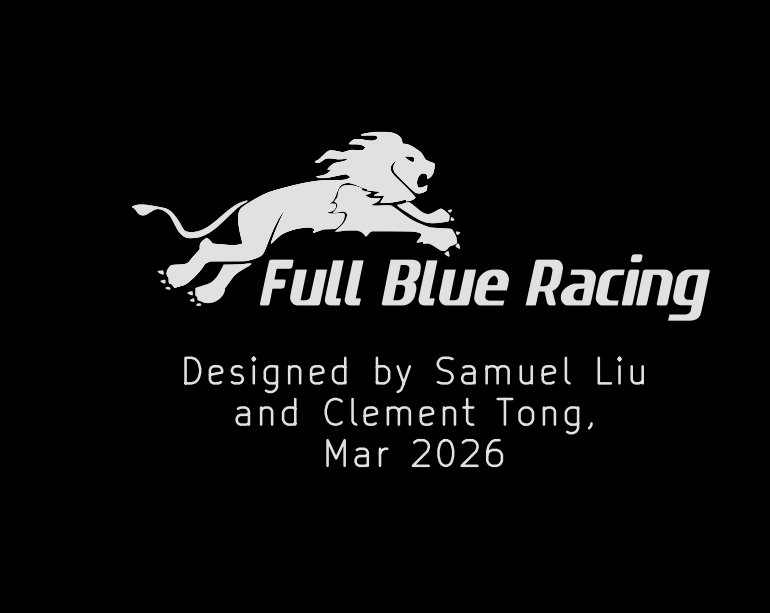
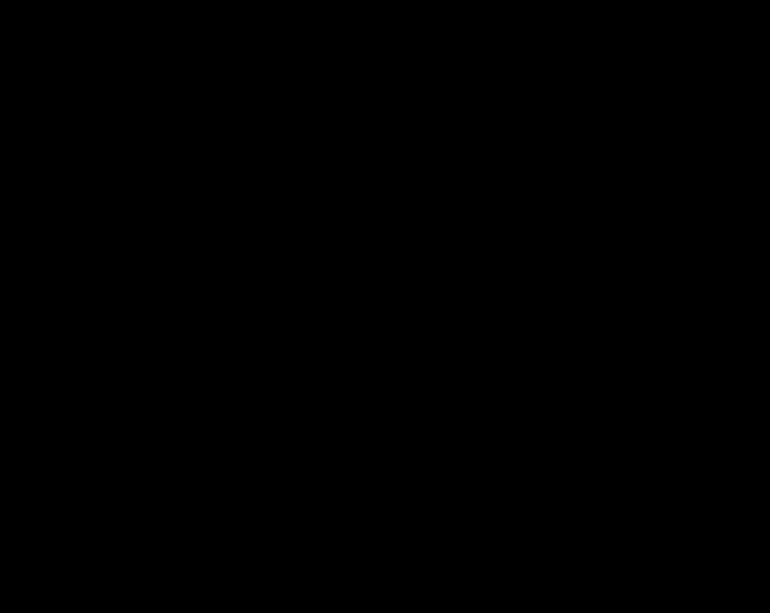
drawing: [131, 131, 710, 321] -> none
text: Designed by Samuel Liu (414, 374) -> none
text: and Clement Tong, (414, 416) -> none
text: Mar 2026 (414, 453) -> none

